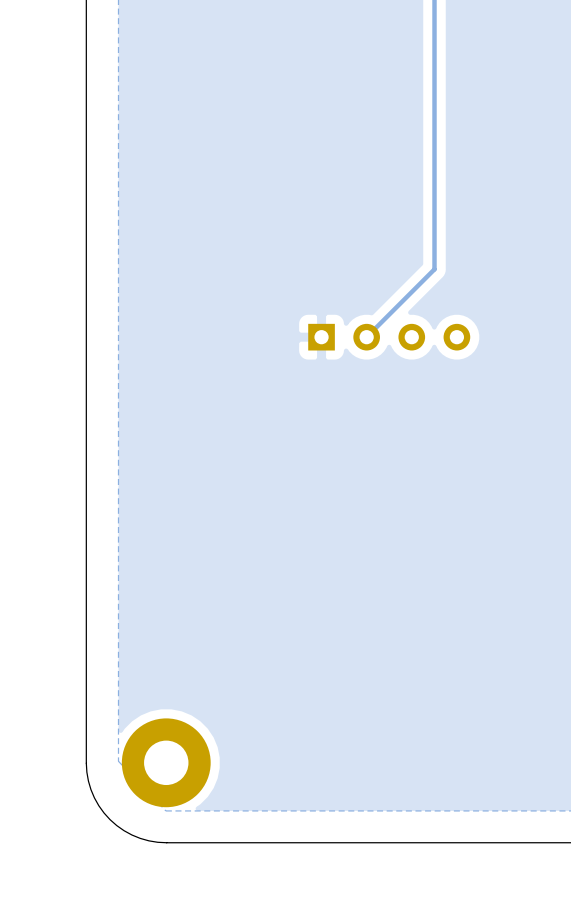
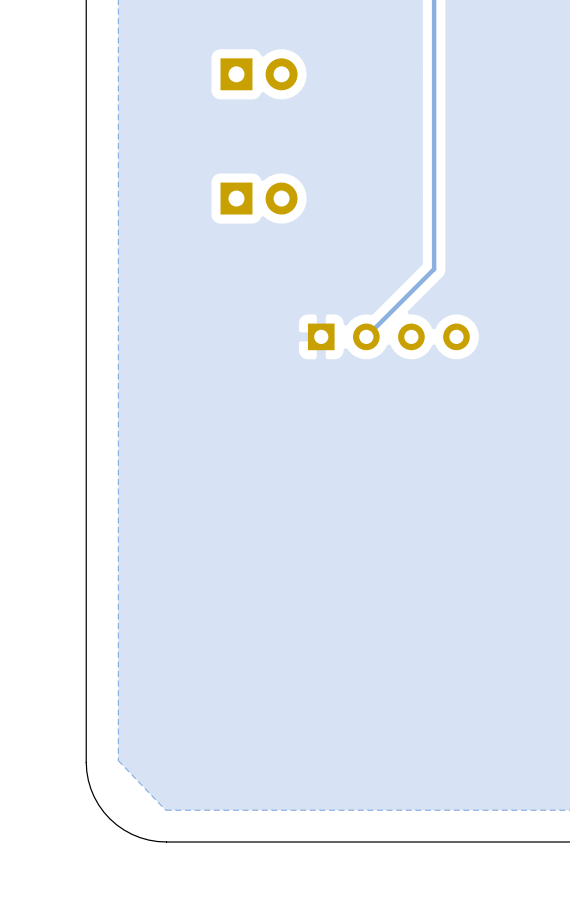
part: none -> (259, 74)
part: none -> (259, 198)
part: (166, 762) -> none

